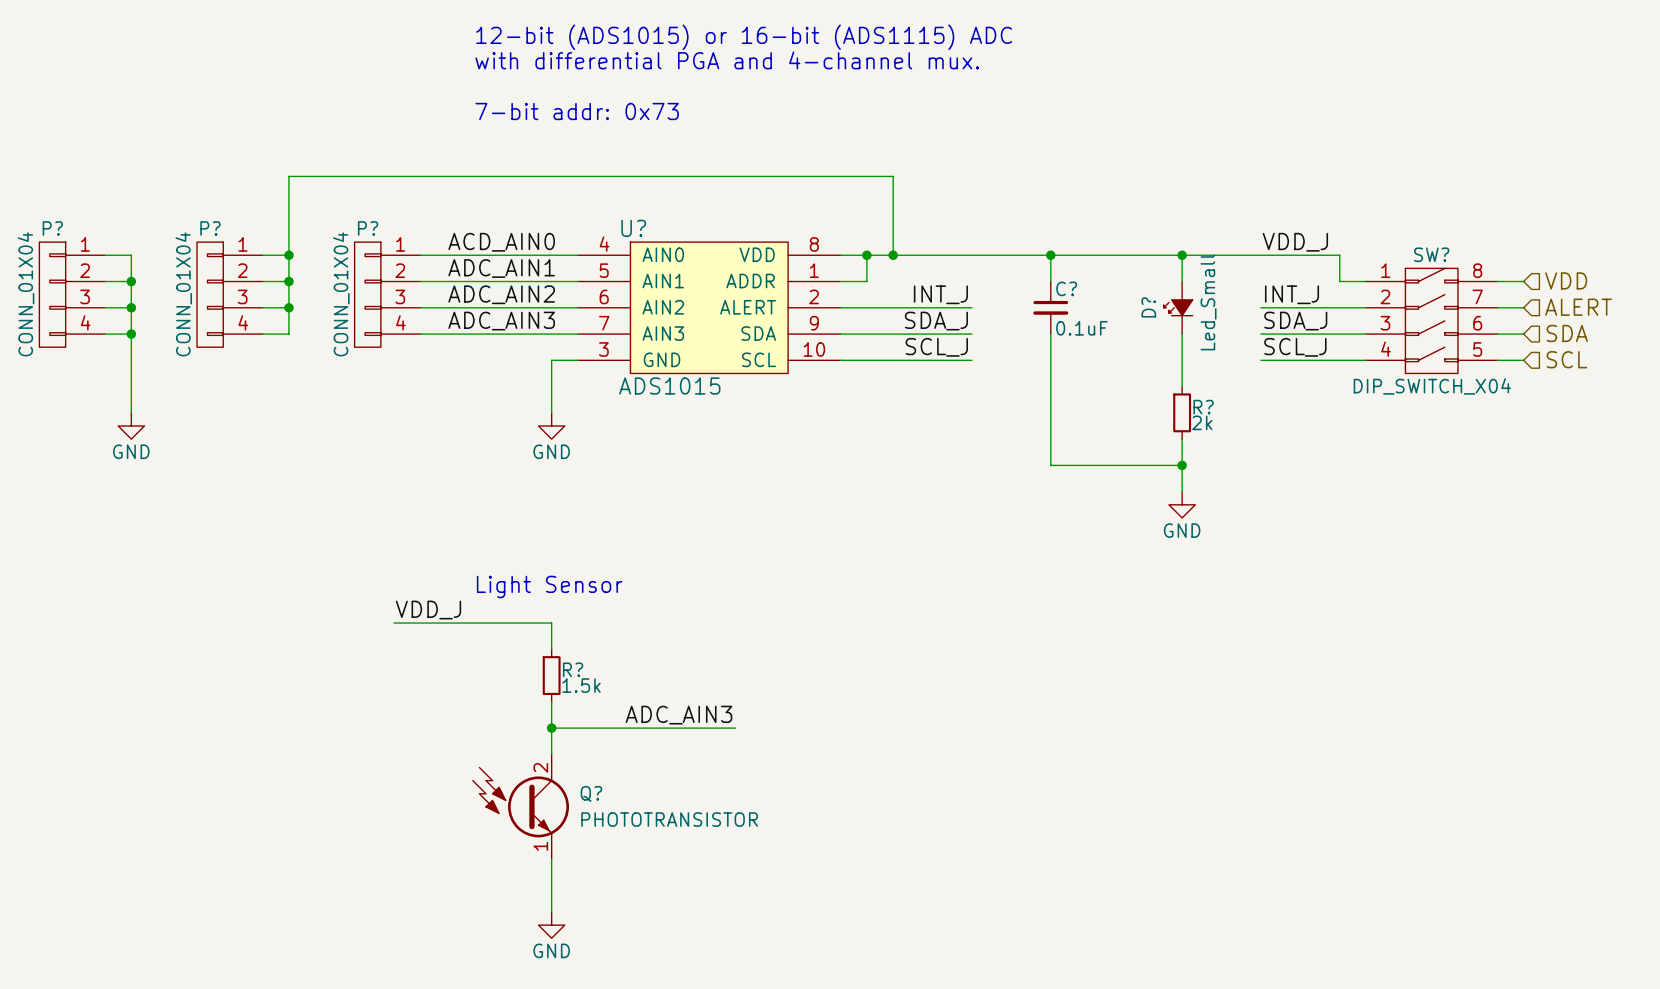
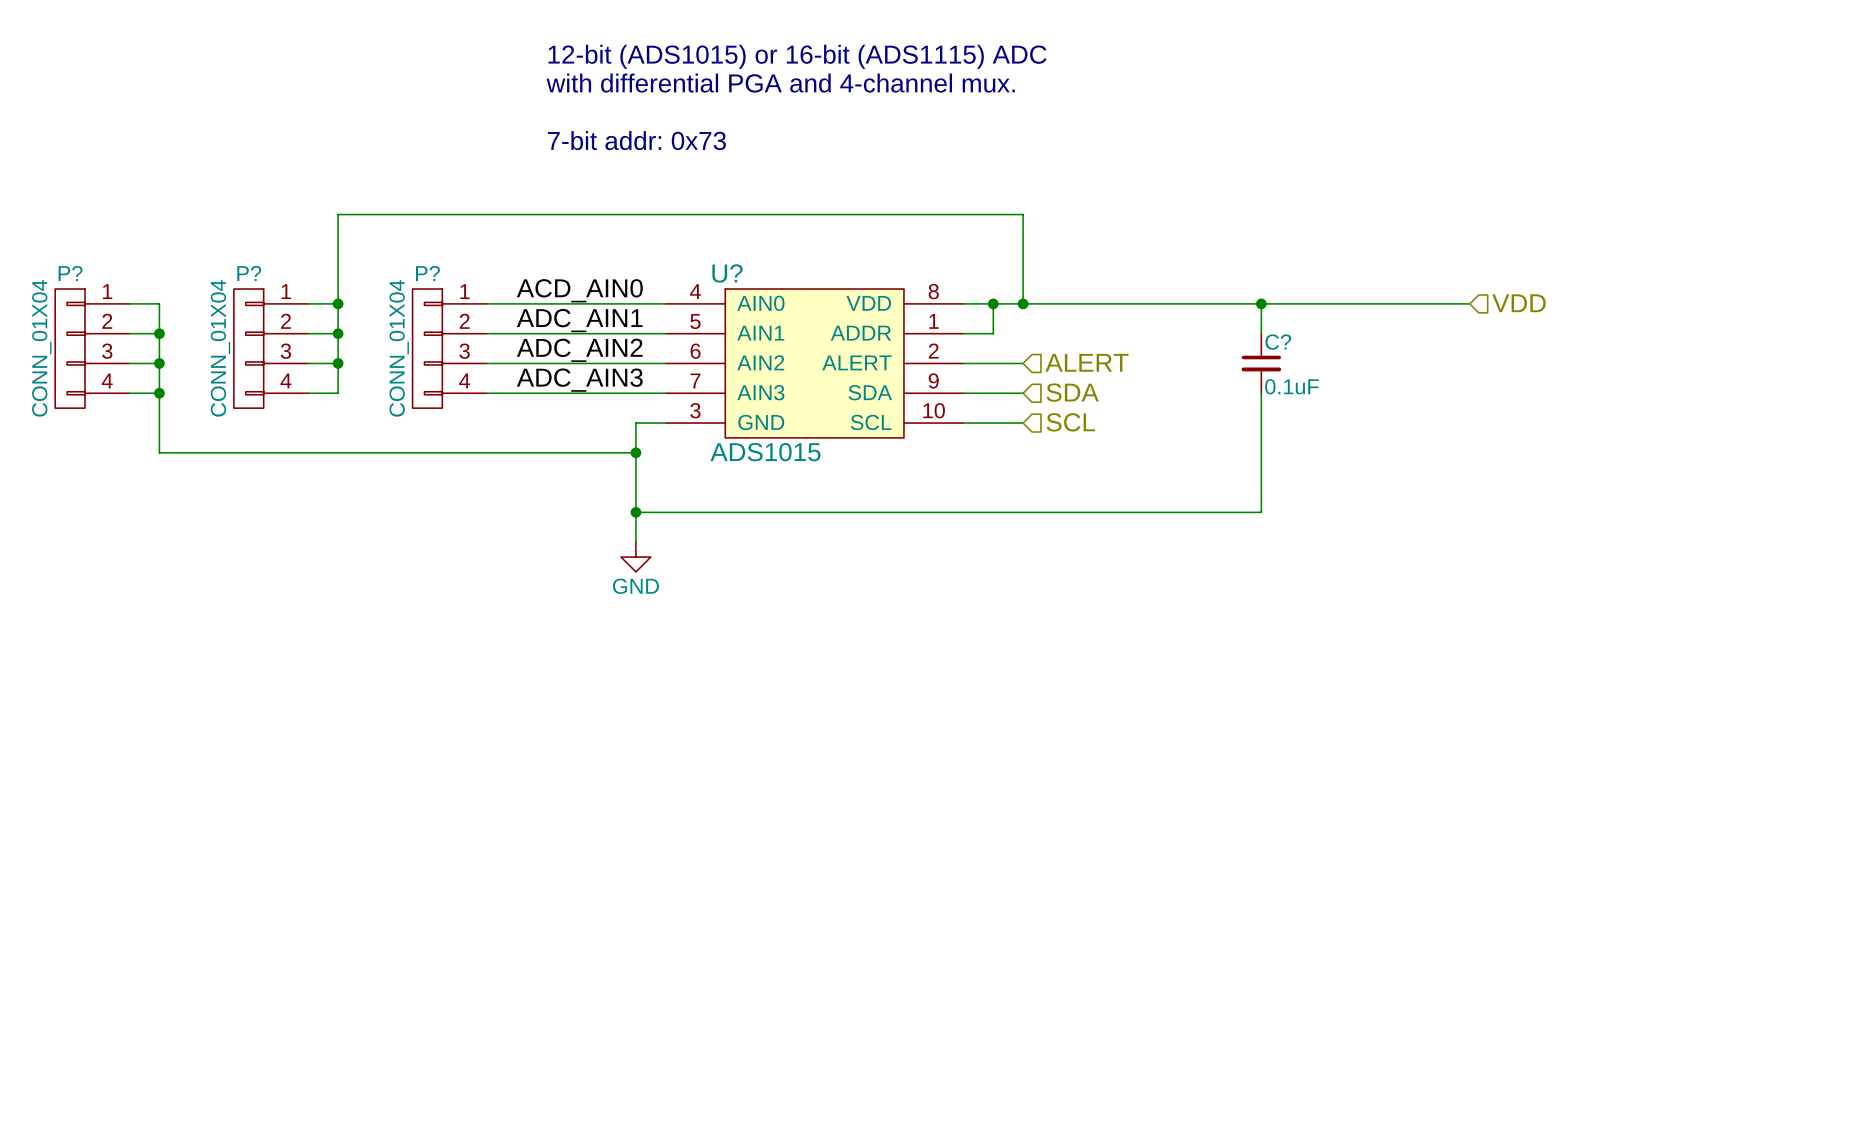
label: VDD_J (1295, 242) -> none
wire: (1050, 255) (1050, 281) -> (1261, 303) (1261, 333)
junction: (1050, 255) -> none
junction: none -> (1261, 303)
wire: (1182, 255) (1182, 281) -> none
junction: (1182, 255) -> none
wire: (1287, 255) (1339, 255) (1339, 281) (1366, 281) -> none
hierarchical label position: VDD (1566, 280) -> VDD (1519, 303)
wire: (1497, 281) (1523, 281) -> none
label: INT_J (940, 294) -> none
label: INT_J (1292, 294) -> none
wire: (893, 307) (971, 307) -> none
hierarchical label: none -> ALERT (1087, 362)
C? position: (1050, 307) -> (1261, 363)
D?: Led_Small (1178, 307) -> none
wire: (1260, 307) (1366, 307) -> none
wire: (1497, 307) (1523, 307) -> none
hierarchical label: ALERT (1578, 307) -> none
SW?: DIP_SWITCH_X04 (1431, 320) -> none
label: SDA_J (936, 321) -> none
label: SDA_J (1295, 321) -> none
hierarchical label: none -> SDA (1072, 392)
hierarchical label: SDA (1567, 333) -> none
wire: (893, 334) (971, 334) -> none
wire: (1050, 334) (1050, 465) (1182, 465) -> none
wire: none -> (1261, 393) (1261, 512) (635, 512)
wire: (1182, 334) (1182, 386) -> none
wire: (1260, 334) (1366, 334) -> none
wire: (1497, 334) (1523, 334) -> none
label: SCL_J (936, 347) -> none
label: SCL_J (1295, 347) -> none
hierarchical label: none -> SCL (1070, 422)
hierarchical label: SCL (1566, 359) -> none
wire: (893, 360) (971, 360) -> none
wire: (1260, 360) (1366, 360) -> none
wire: (1497, 360) (1523, 360) -> none
wire: (131, 386) (131, 412) -> (159, 452) (635, 452)
junction: none -> (635, 452)
wire: none -> (635, 482) (635, 542)
R?: 2k (1182, 412) -> none
power symbol: GND (131, 426) -> none
power symbol position: GND (551, 426) -> GND (635, 557)
junction: none -> (635, 512)
wire: (1182, 439) (1182, 491) -> none
junction: (1182, 465) -> none
power symbol: GND (1182, 504) -> none
text: Light Sensor (549, 586) -> none
label: VDD_J (428, 610) -> none
wire: (394, 623) (551, 623) (551, 649) -> none
R?: 1.5k (551, 675) -> none
wire: (551, 701) (551, 754) -> none
label: ADC_AIN3 (678, 715) -> none
wire: (551, 728) (735, 728) -> none
junction: (551, 728) -> none
Q?: PHOTOTRANSISTOR (520, 806) -> none
wire: (551, 859) (551, 912) -> none
power symbol: GND (551, 925) -> none

